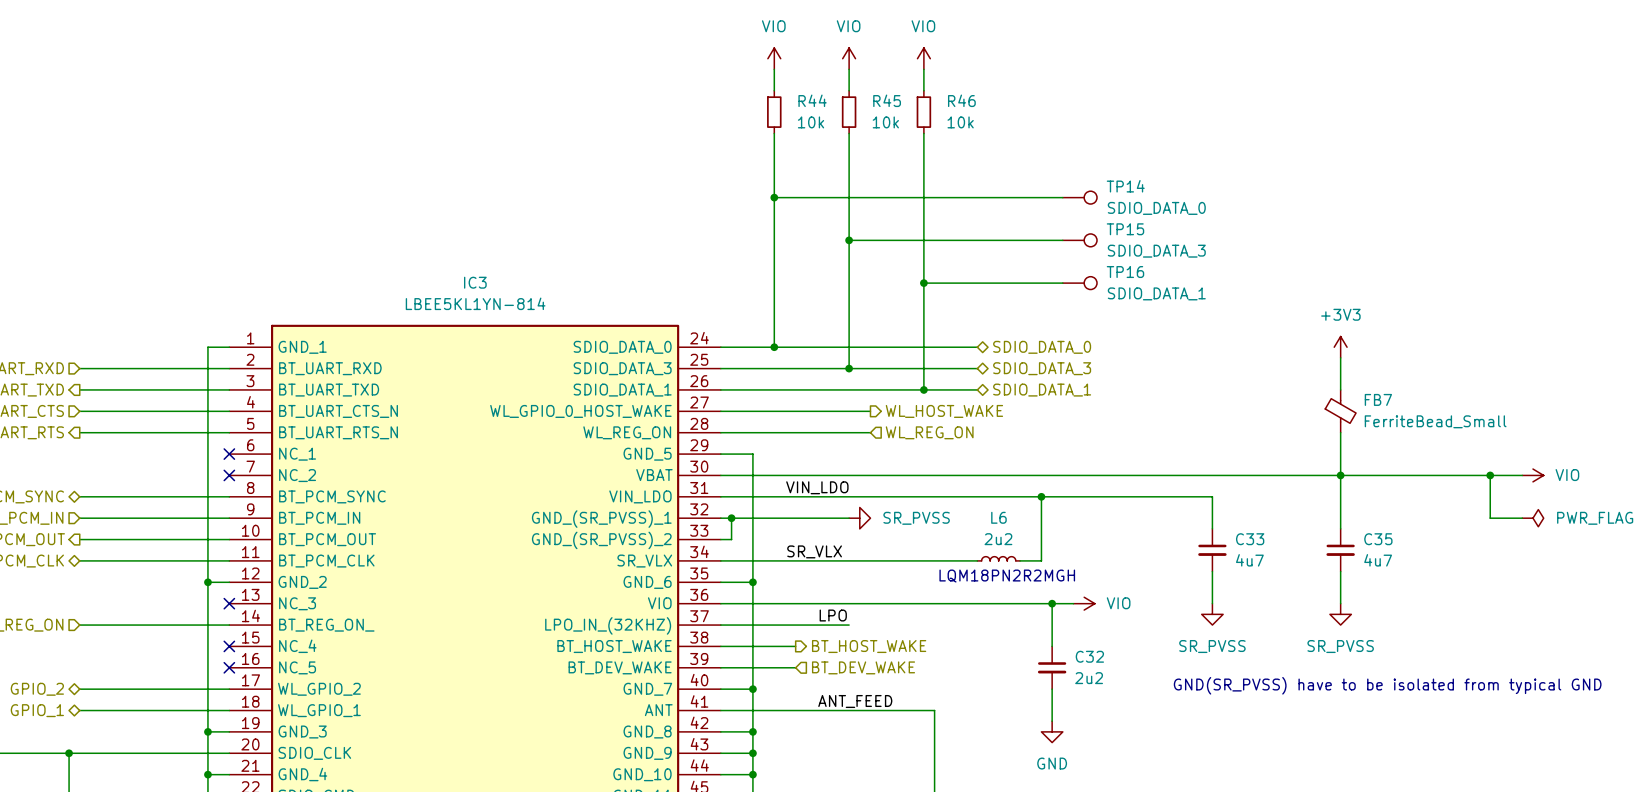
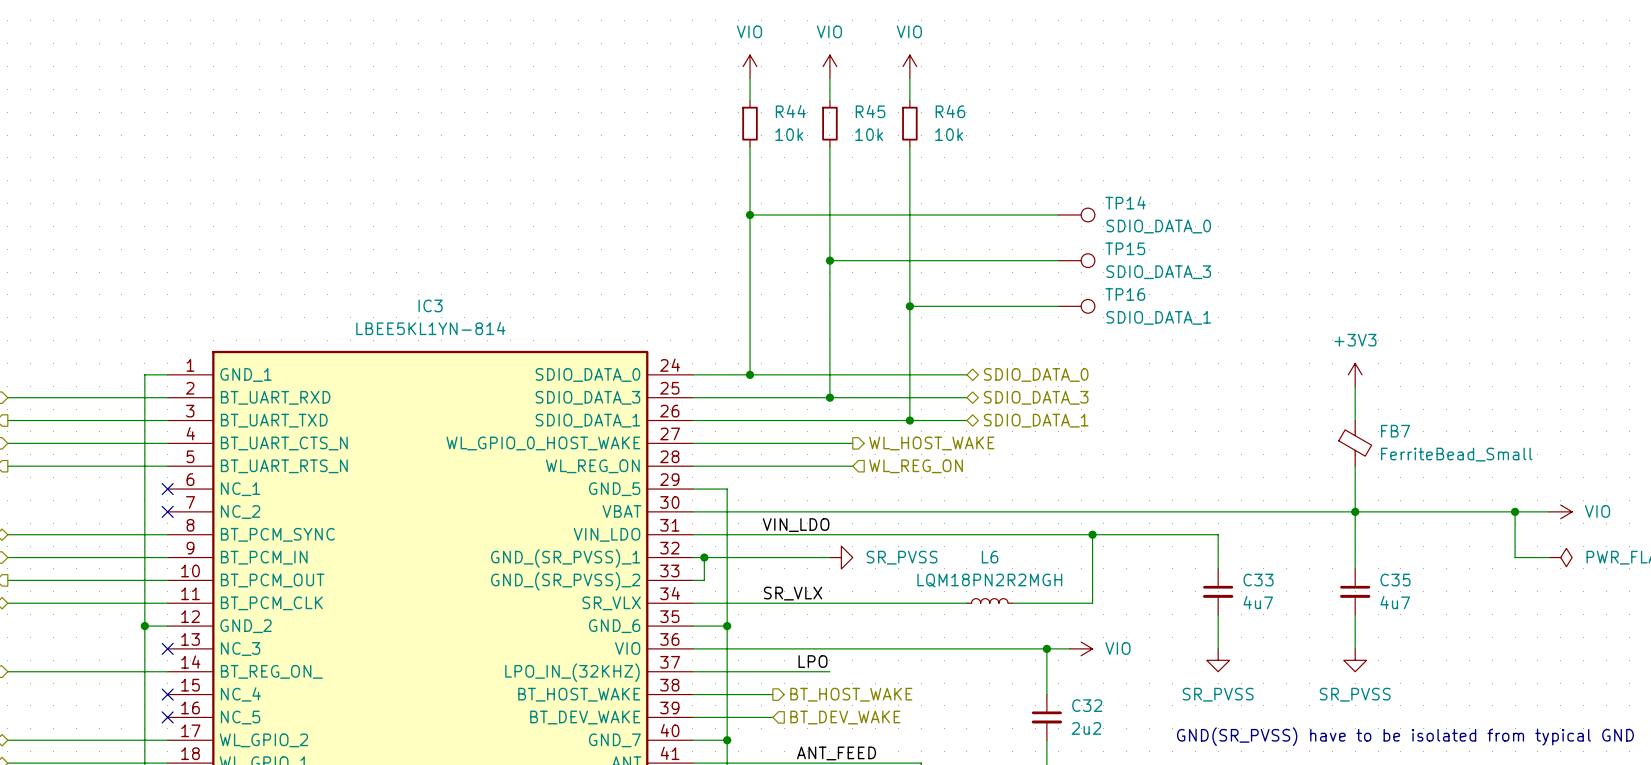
wire: (1041, 496) (1041, 560) -> (1092, 534) (1092, 603) (1035, 603)
junction: (1041, 496) -> none
junction: none -> (1092, 534)
L6 value: 2u2 (998, 539) -> LQM18PN2R2MGH (989, 580)
text: LQM18PN2R2MGH (1007, 576) -> none

